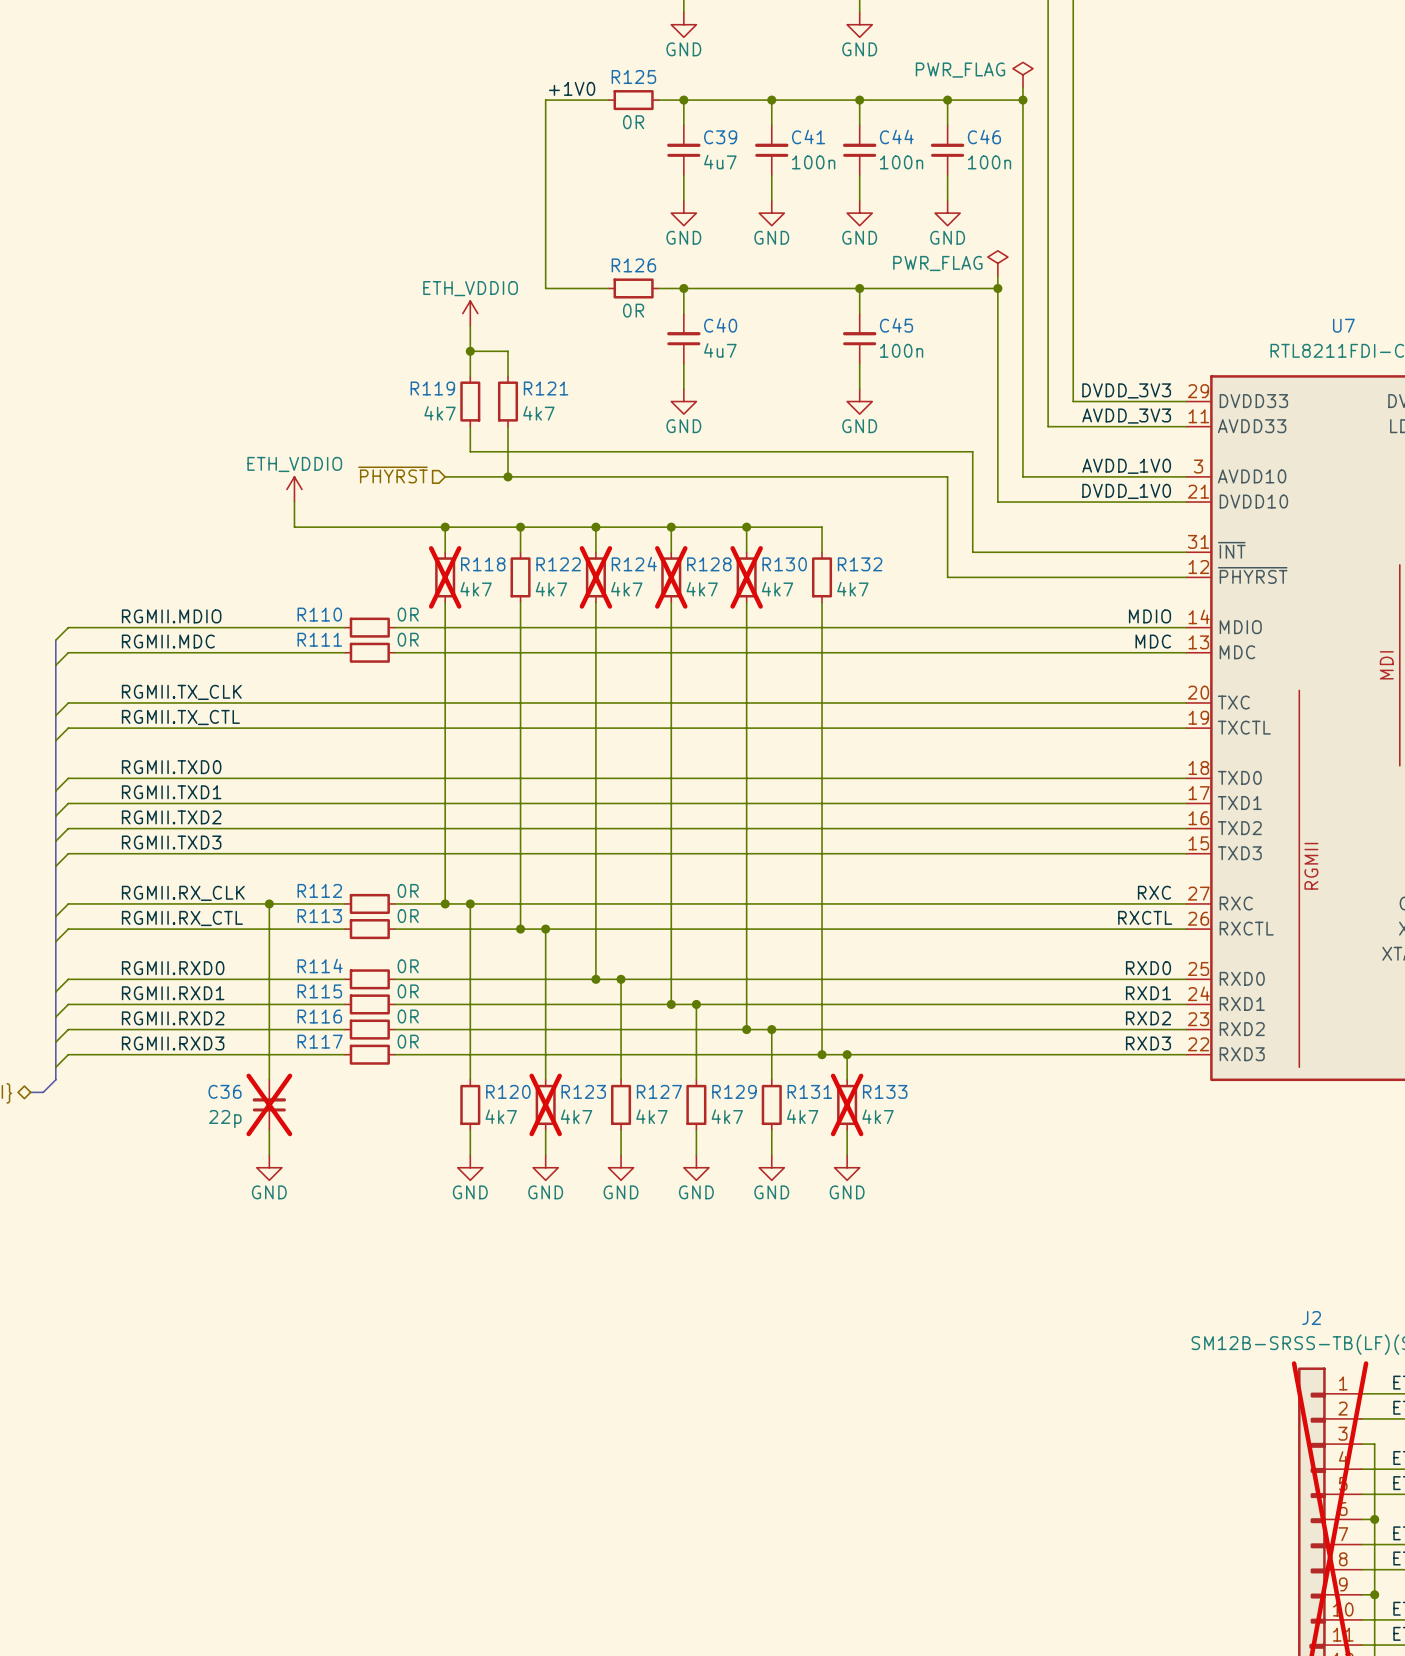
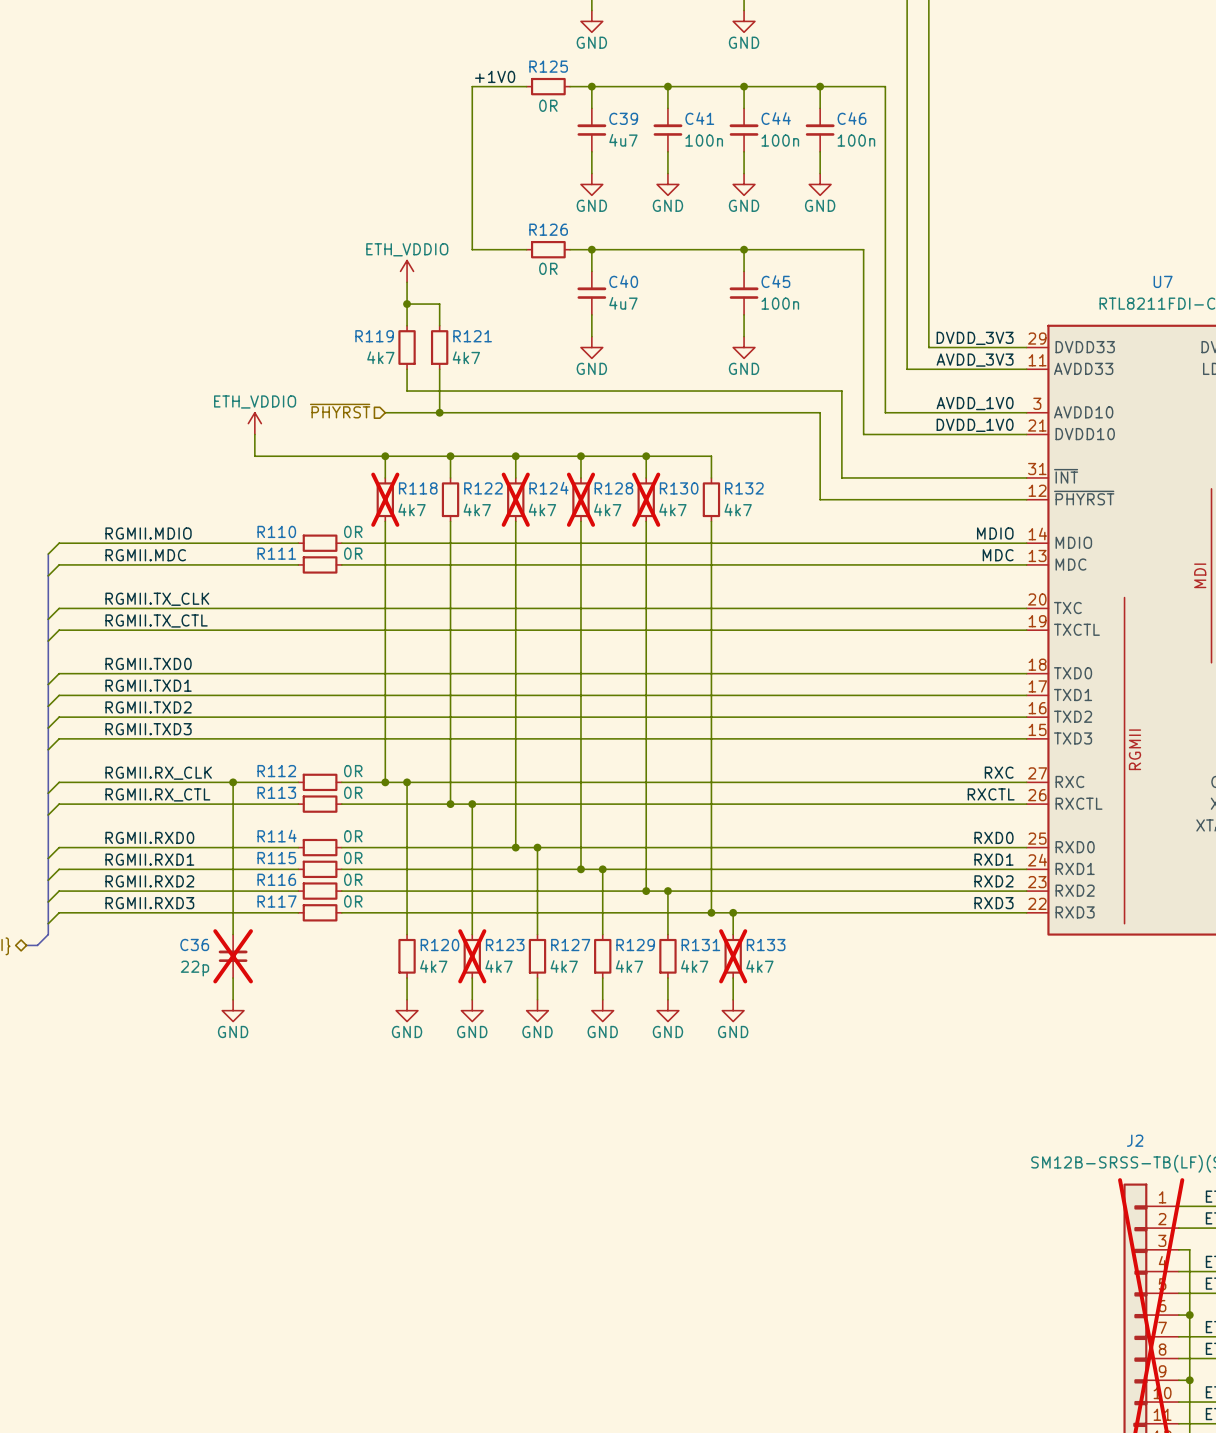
power symbol: PWR_FLAG (1022, 74) -> none
wire: (1022, 87) (1022, 100) -> none
junction: (1022, 100) -> none
power symbol: PWR_FLAG (997, 263) -> none
wire: (997, 275) (997, 288) -> none
junction: (997, 288) -> none

